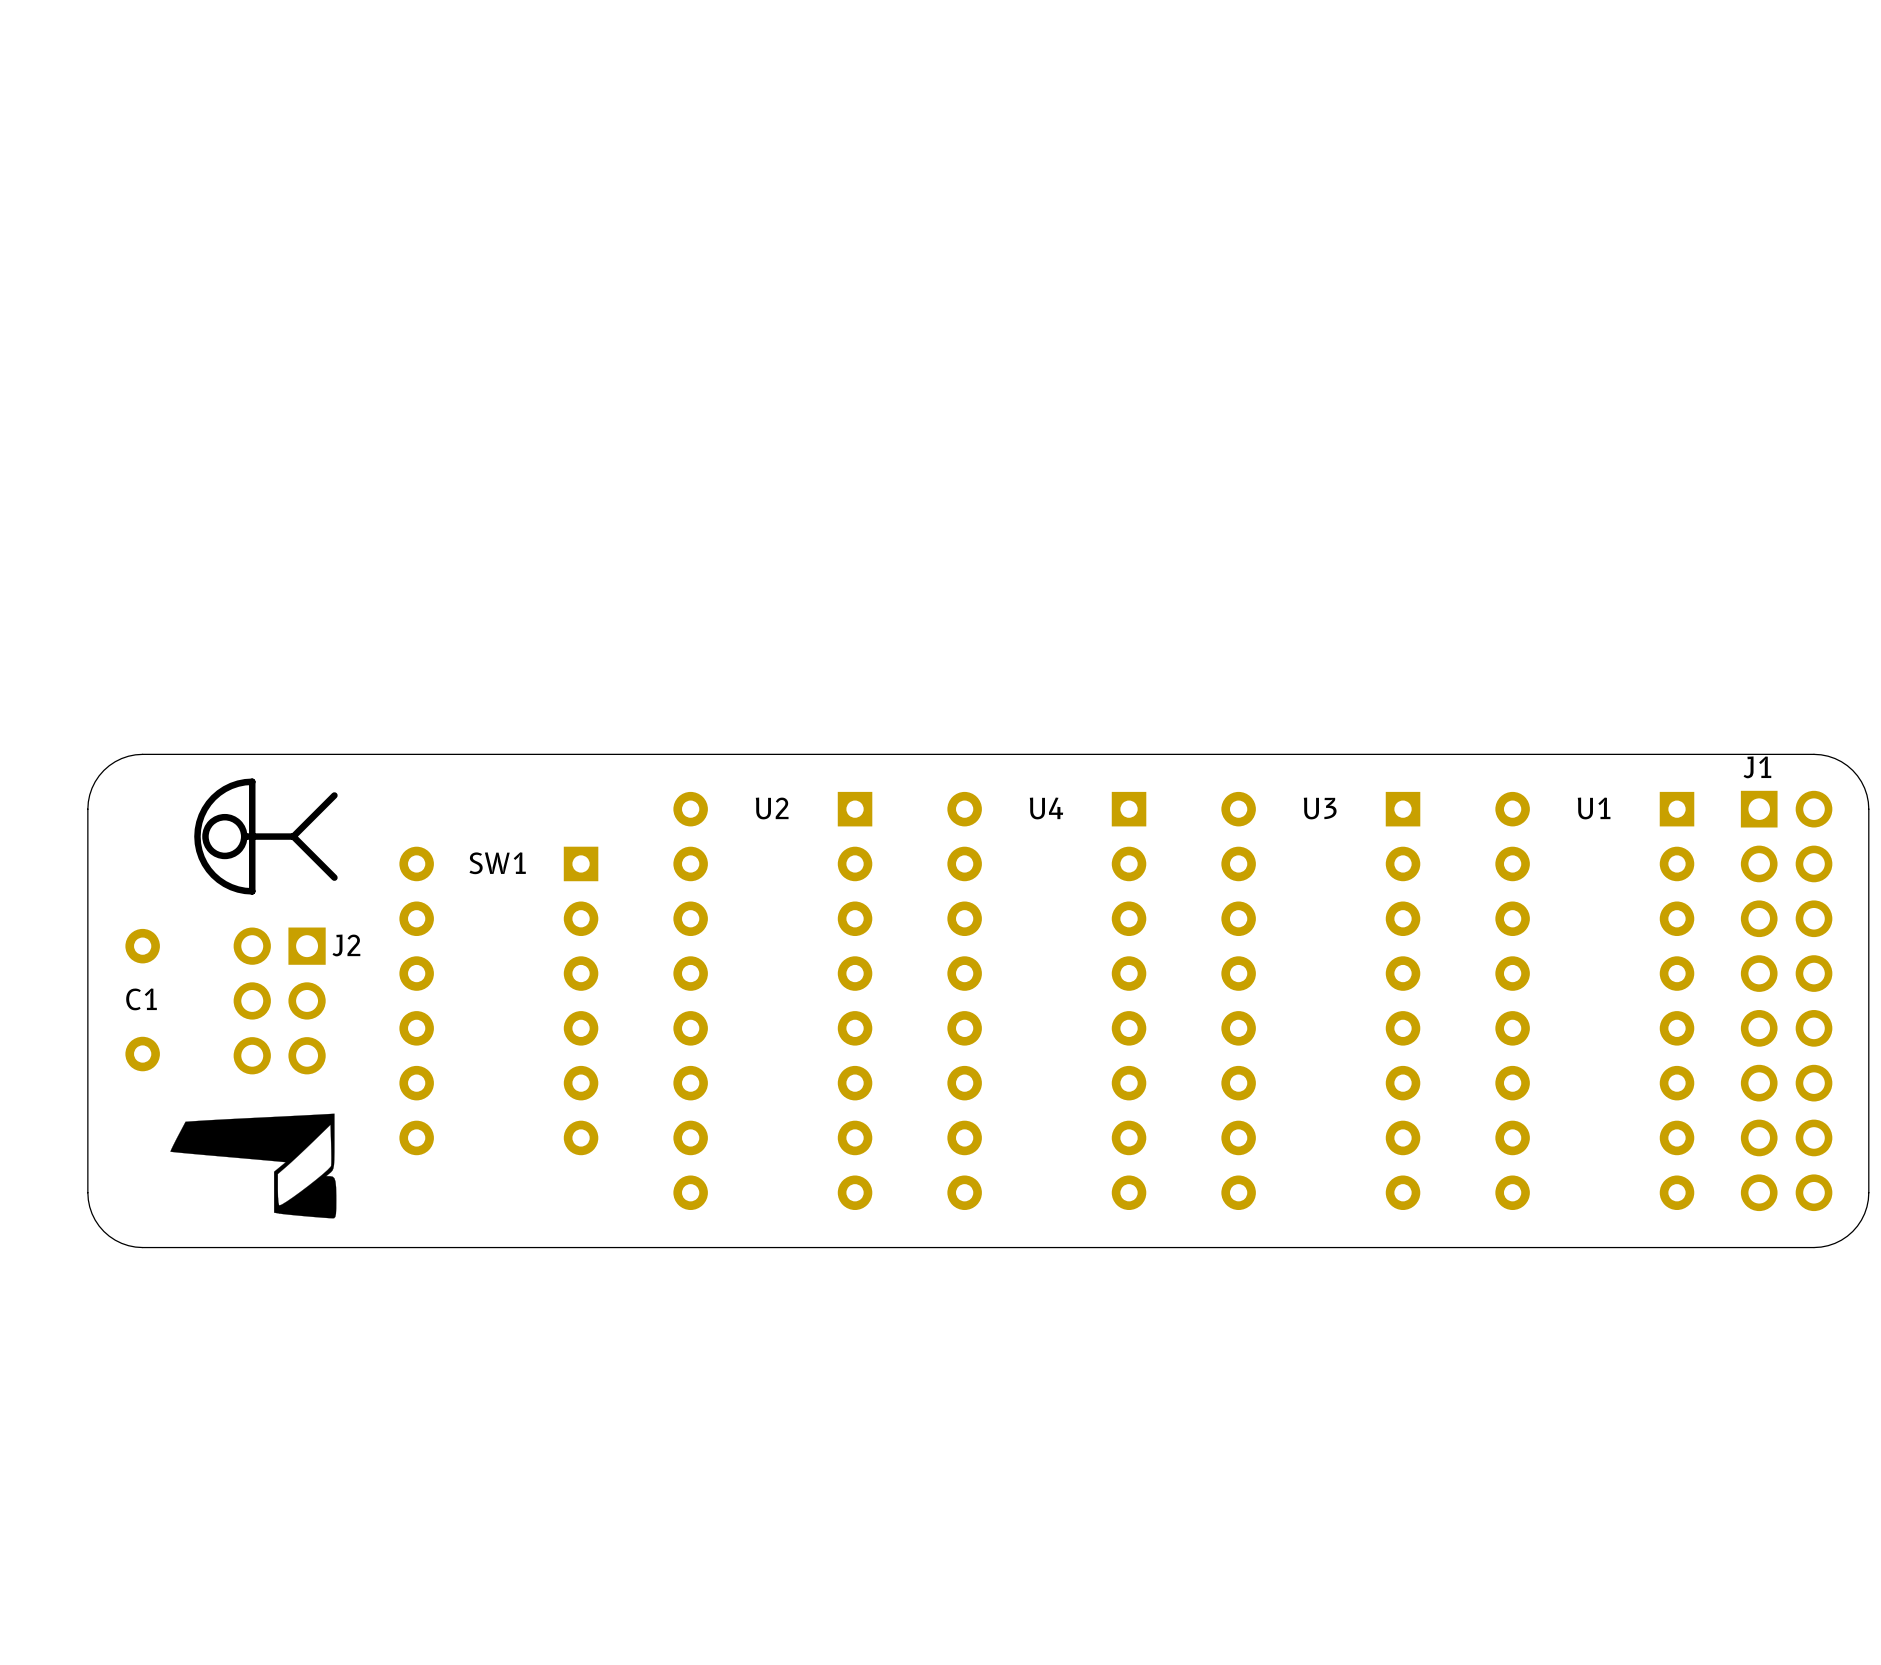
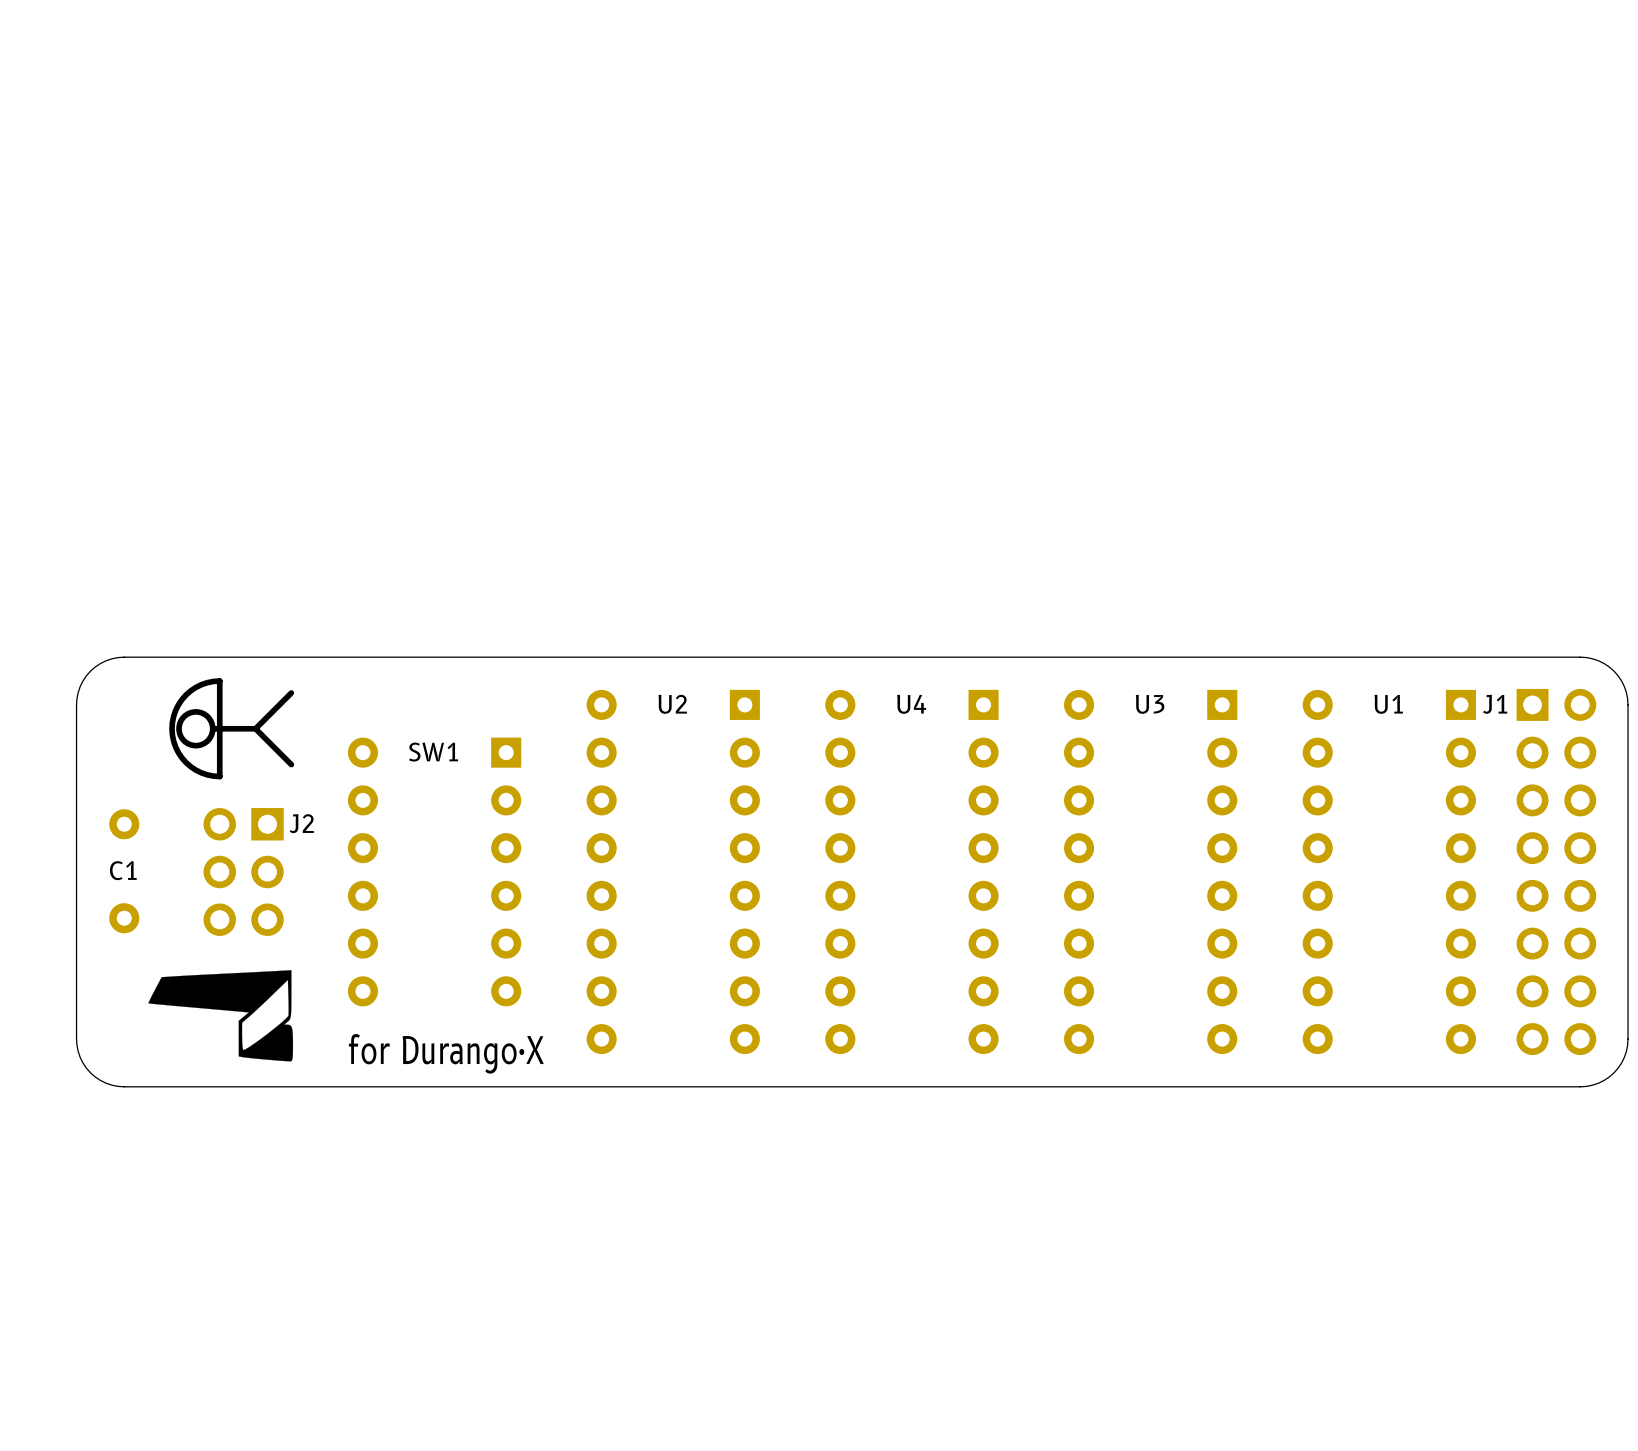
J1 name position: J1 (1757, 767) -> J1 (1495, 704)
text: none -> for Durango·X (446, 1053)

